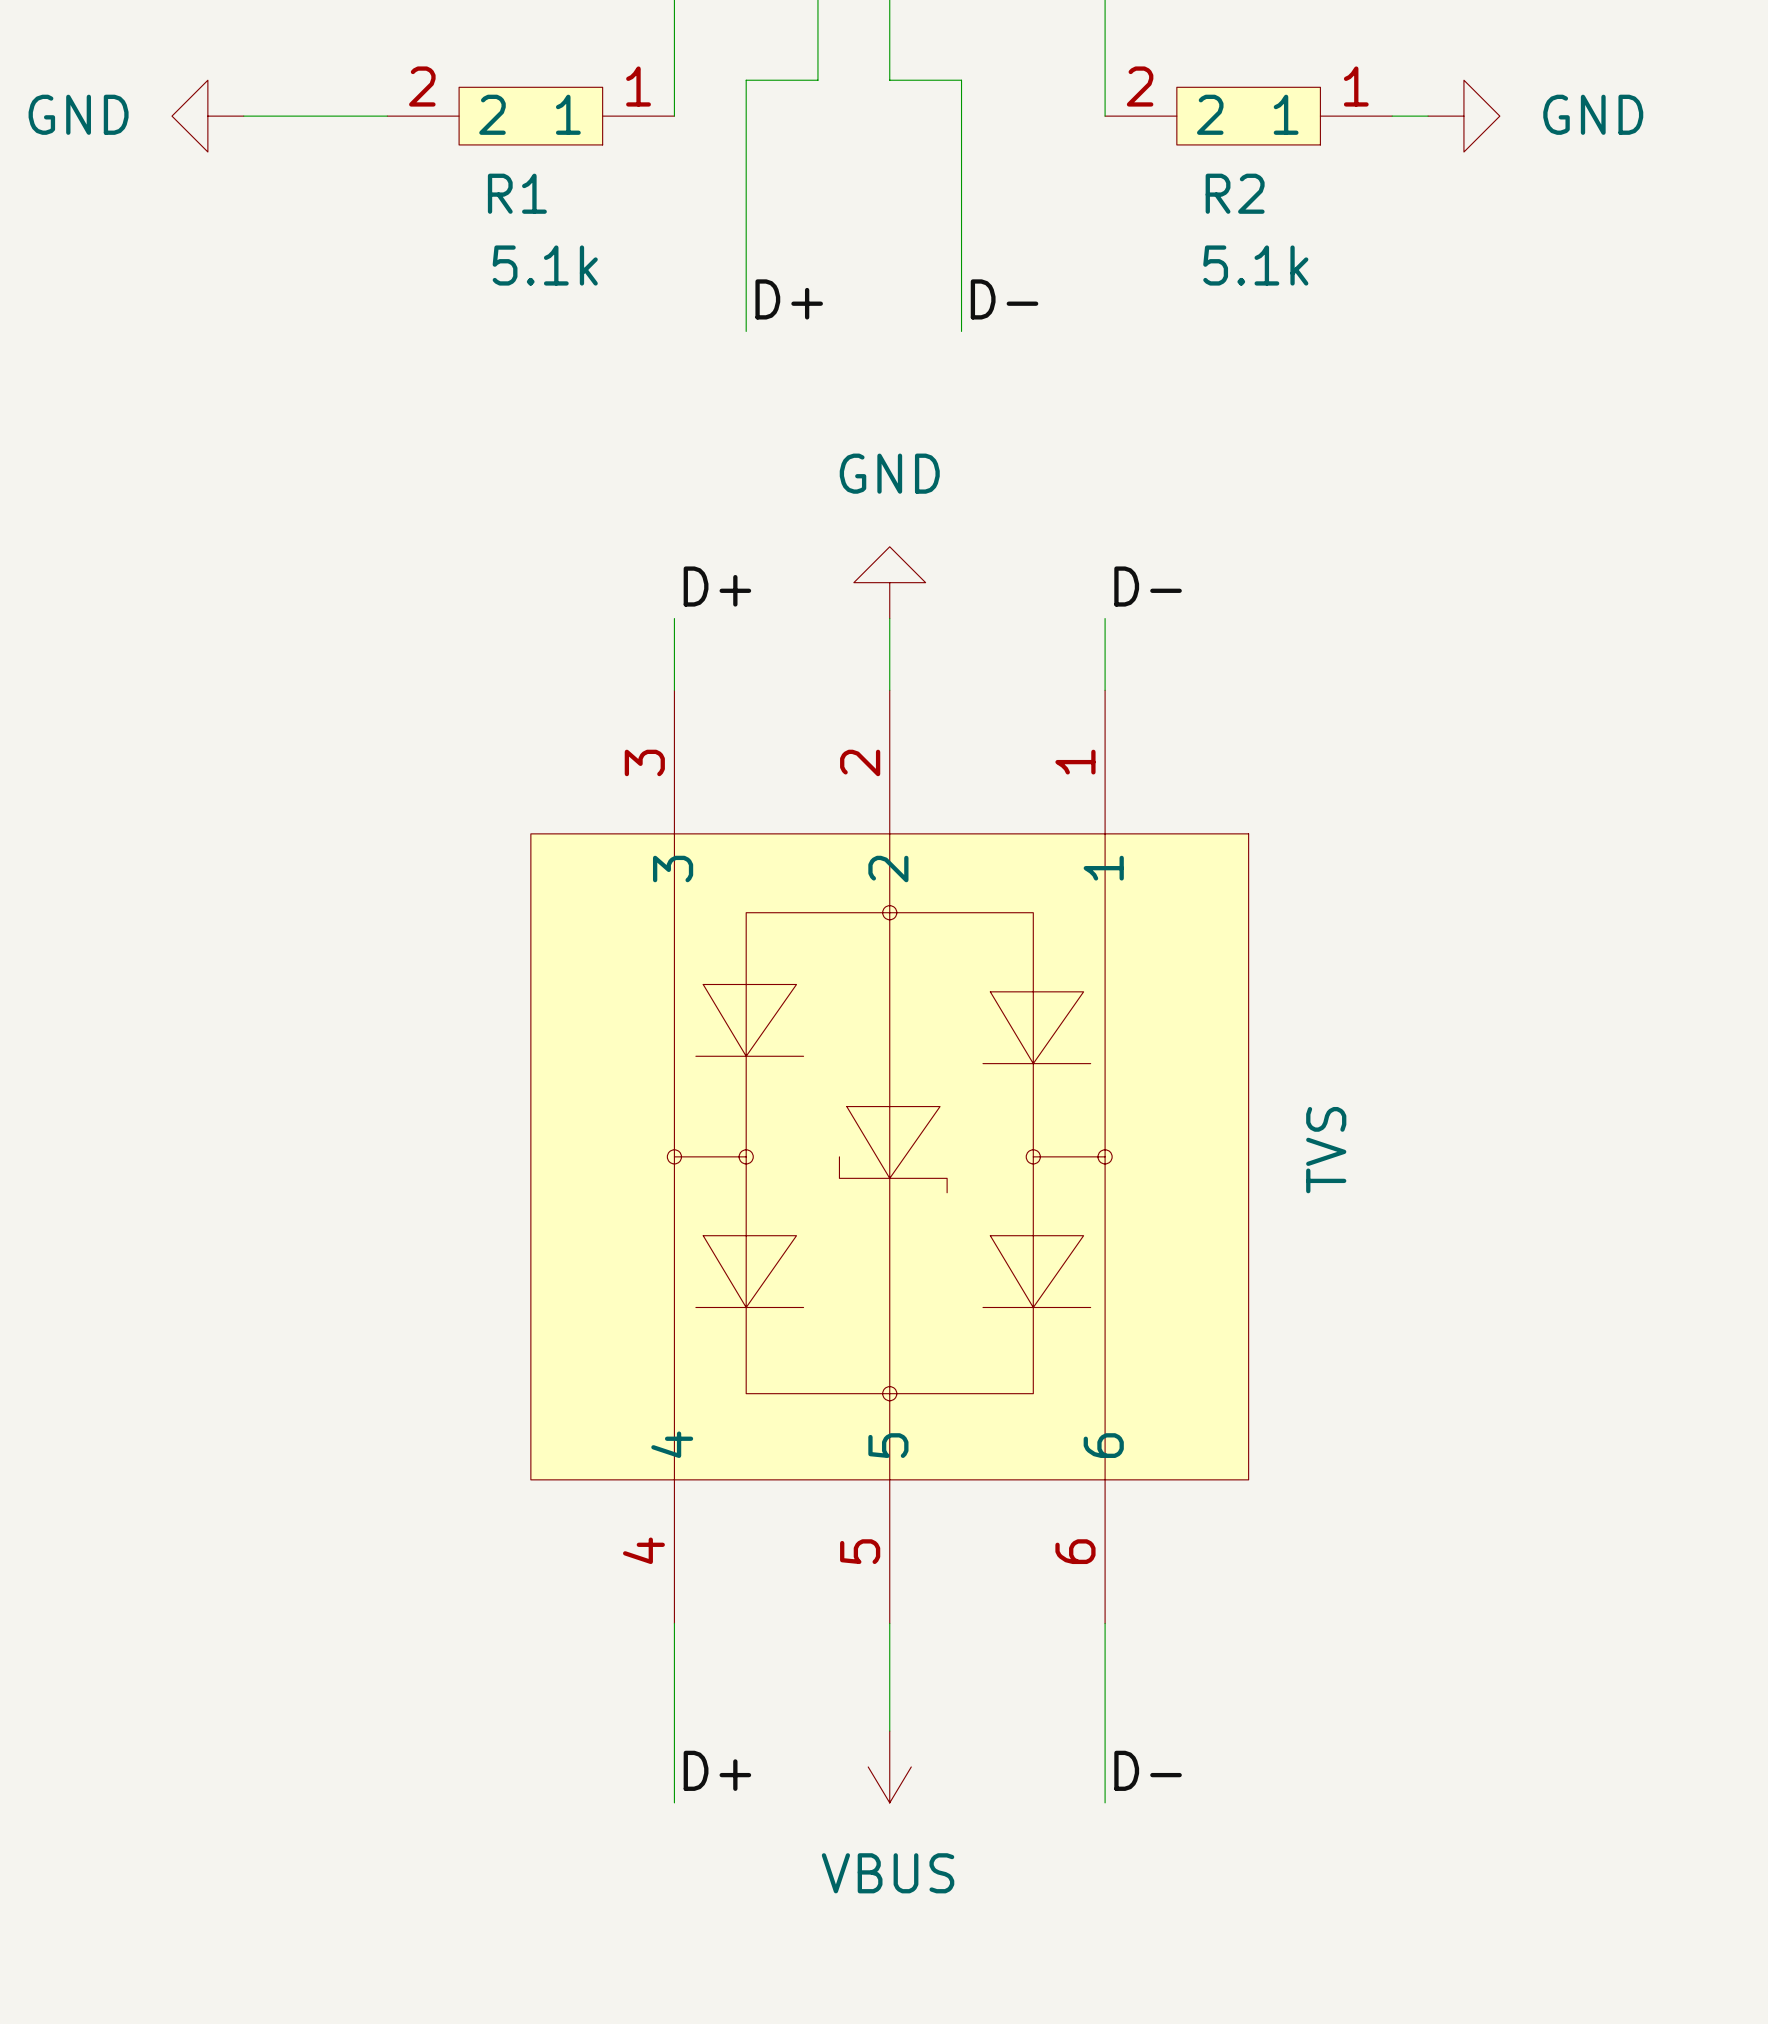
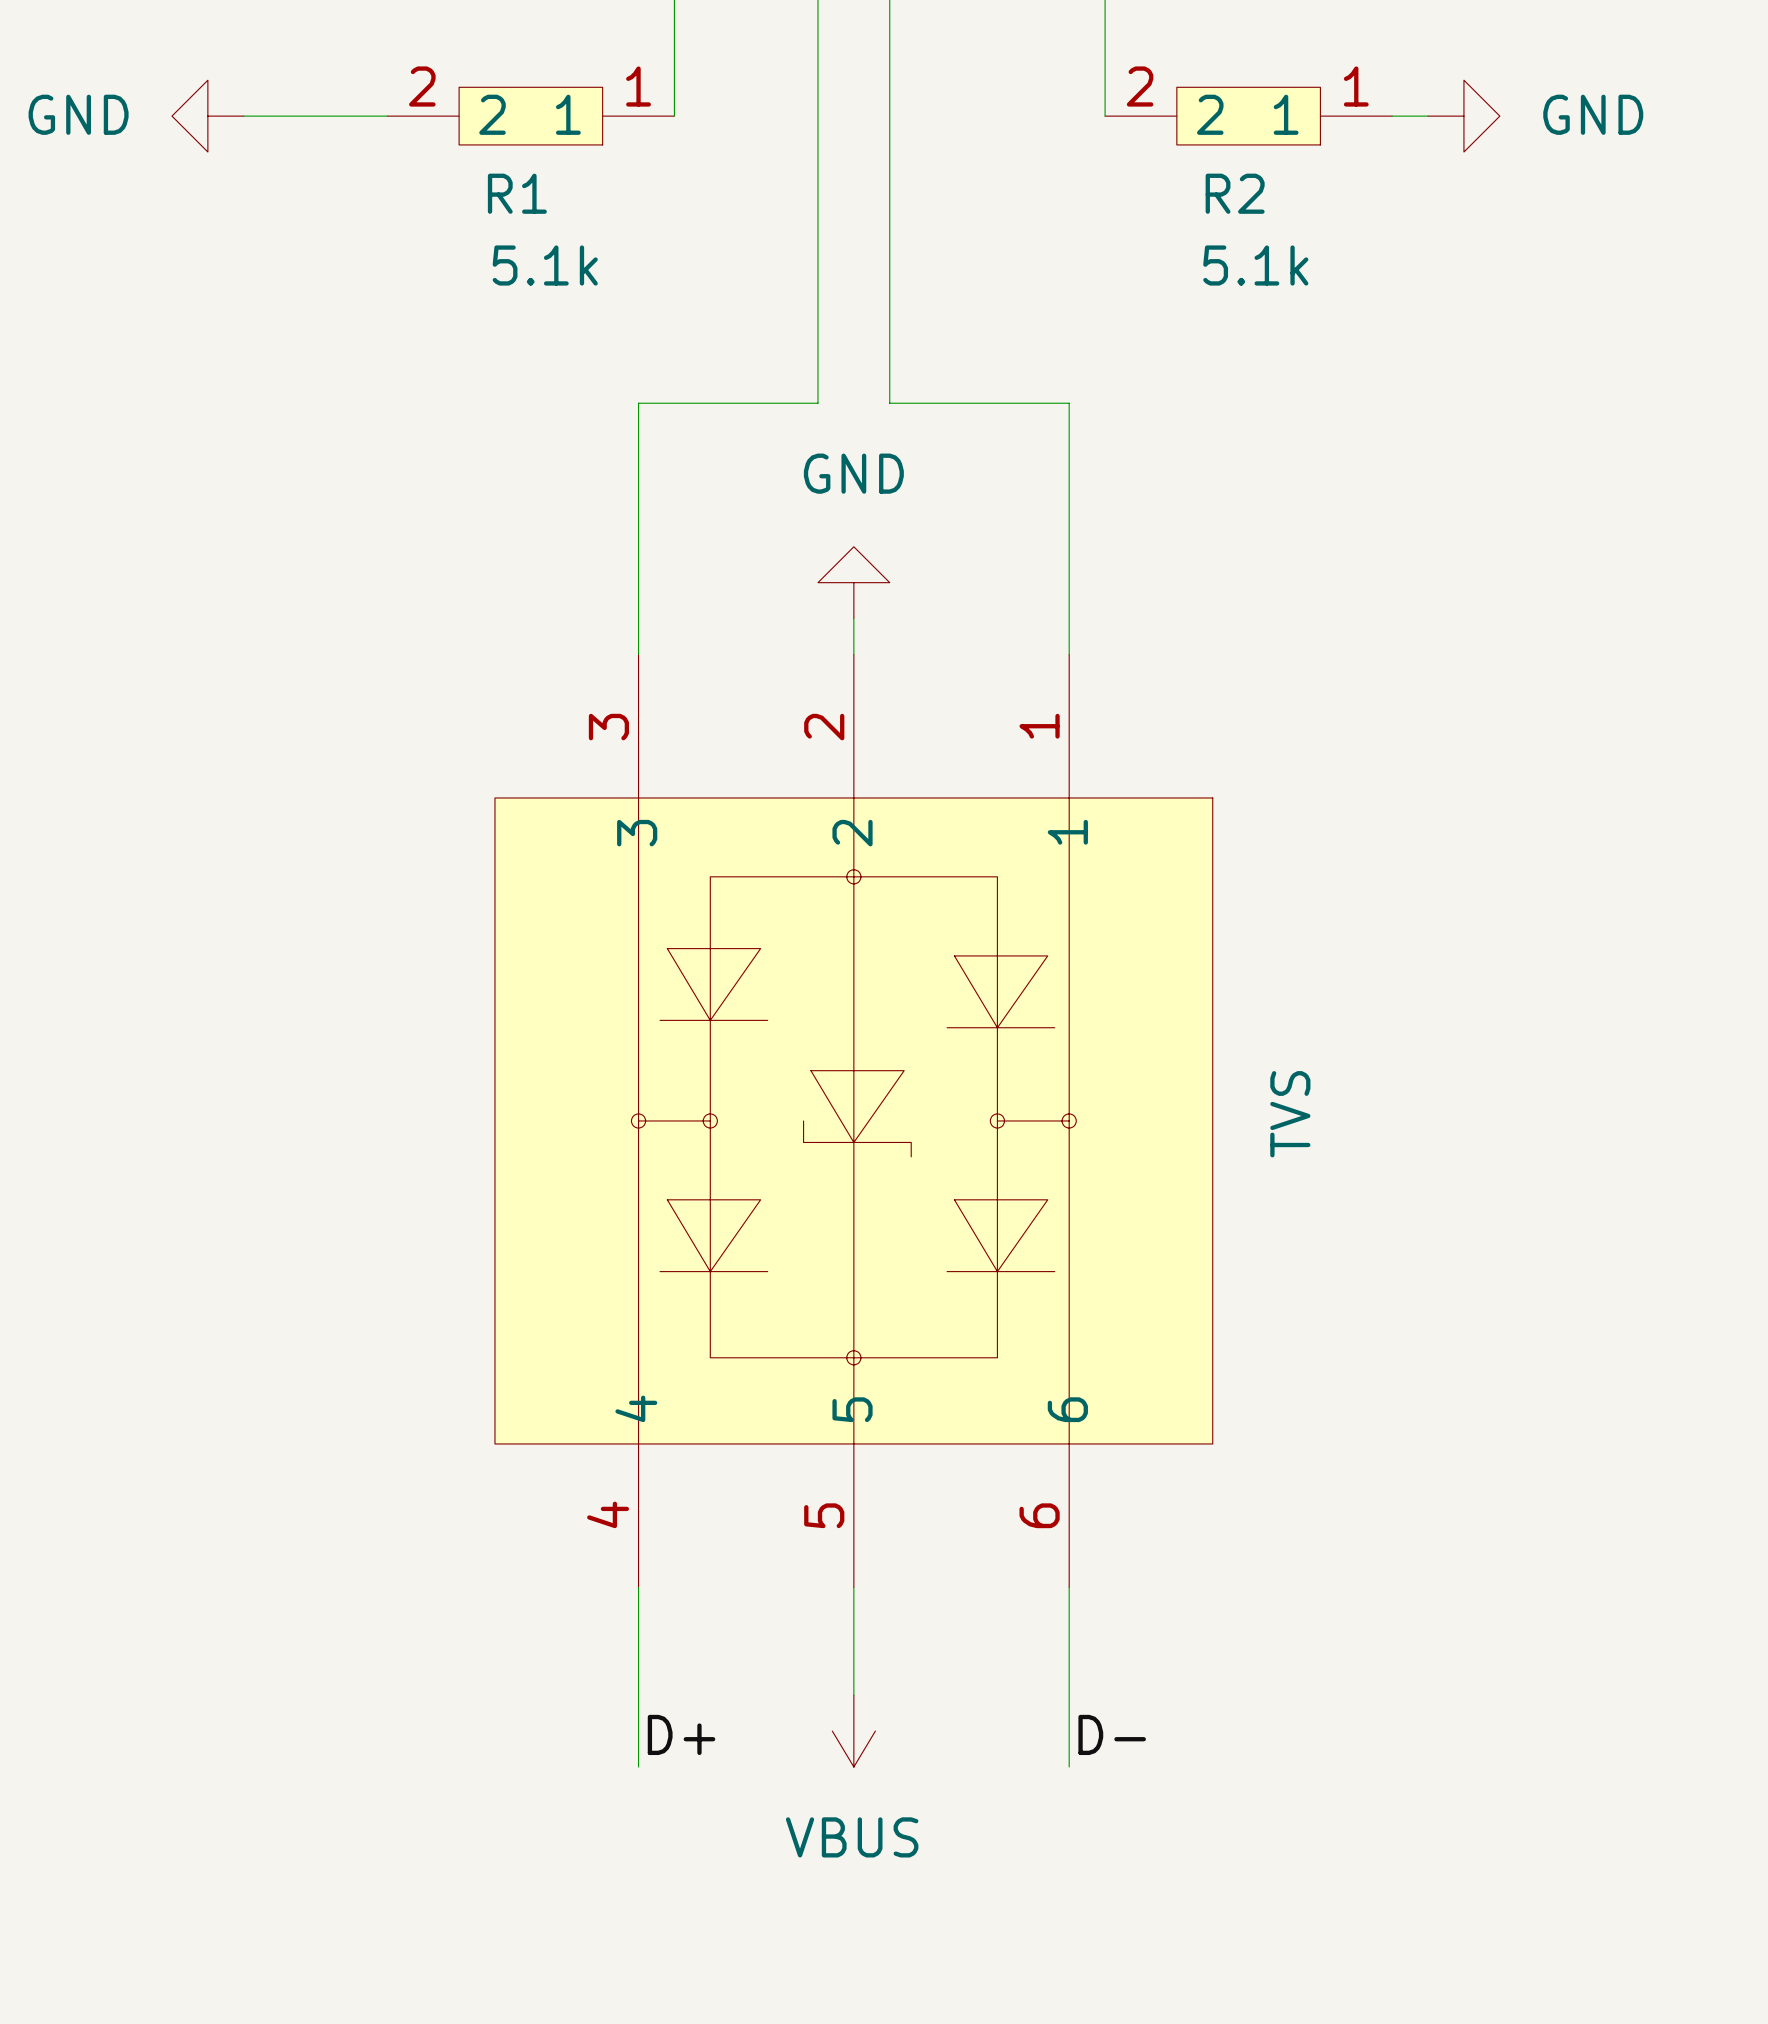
wire: (817, 80) (746, 80) (746, 331) -> (817, 80) (817, 403) (638, 403) (638, 654)
wire: (889, 80) (961, 80) (961, 331) -> (889, 80) (889, 403) (1069, 403) (1069, 654)
label: D+ (789, 299) -> none
label: D- (1004, 299) -> none
power symbol position: GND (889, 582) -> GND (853, 582)
label: D+ (717, 586) -> none
label: D- (1148, 586) -> none
wire: (674, 618) (674, 690) -> none
wire: none -> (853, 618) (853, 654)
wire: (889, 618) (889, 690) -> none
wire: (1105, 618) (1105, 690) -> none
part position: (889, 1156) -> (853, 1120)
wire: (674, 1623) (674, 1802) -> (638, 1587) (638, 1766)
wire: (889, 1623) (889, 1731) -> (853, 1587) (853, 1695)
wire: (1105, 1623) (1105, 1802) -> (1069, 1587) (1069, 1766)
power symbol position: VBUS (889, 1766) -> VBUS (853, 1731)
label position: D+ (717, 1770) -> D+ (681, 1734)
label position: D- (1148, 1770) -> D- (1112, 1734)

